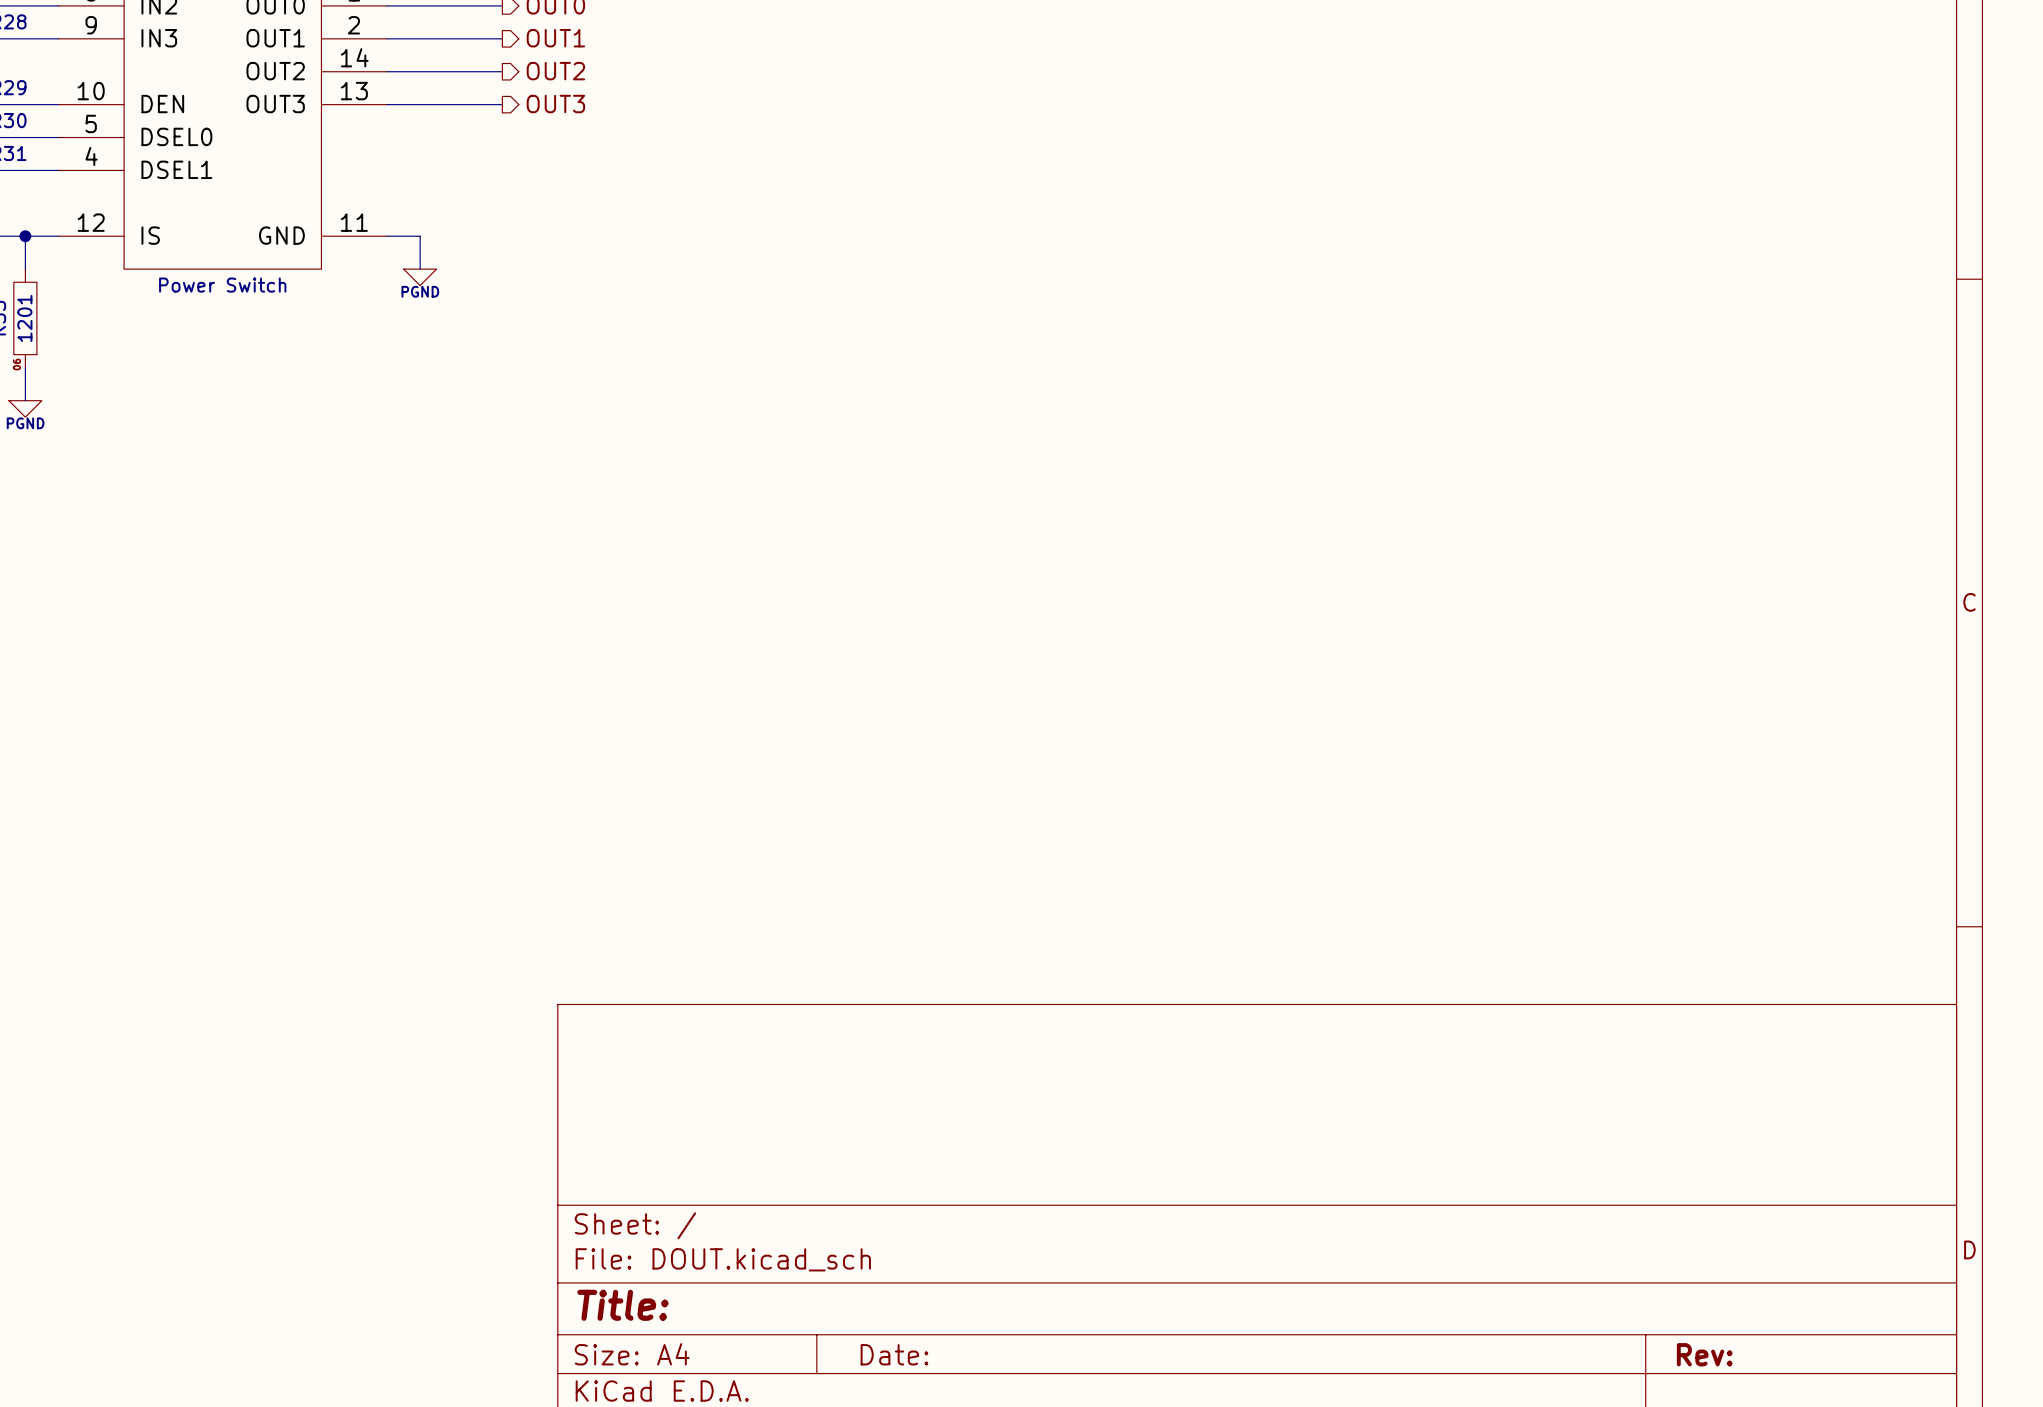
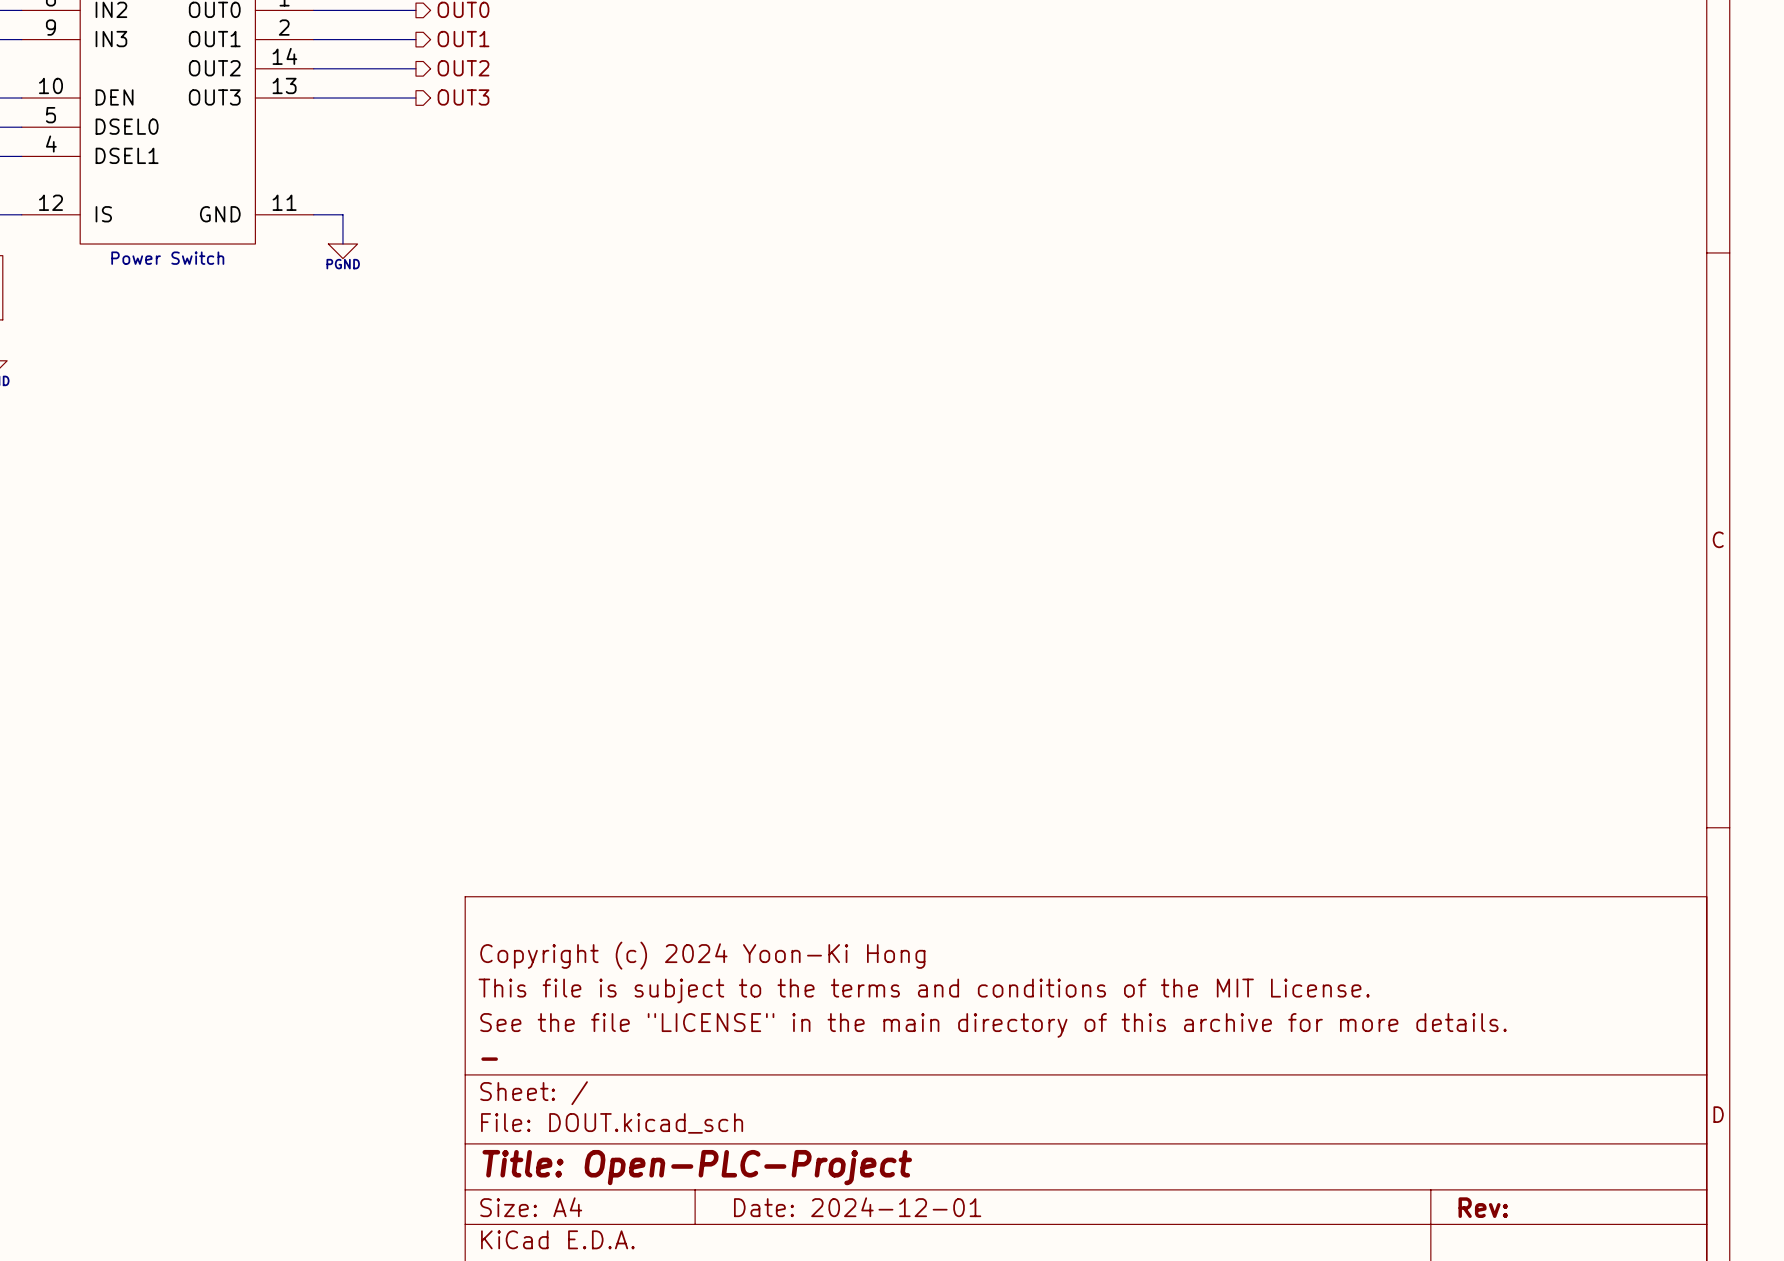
title block: none -> Copyright (c) 2024 Yoon-Ki Hong (702, 955)
title block: none -> This file is subject to the terms and conditions of the MIT License. (924, 990)
title block: none -> See the file "LICENSE" in the main directory of this archive for more details. (993, 1025)
title block: none -> - (489, 1059)
title block: Title: (622, 1305) -> Title: Open-PLC-Project (697, 1167)
title block: Date: (894, 1354) -> Date: 2024-12-01 (857, 1207)

